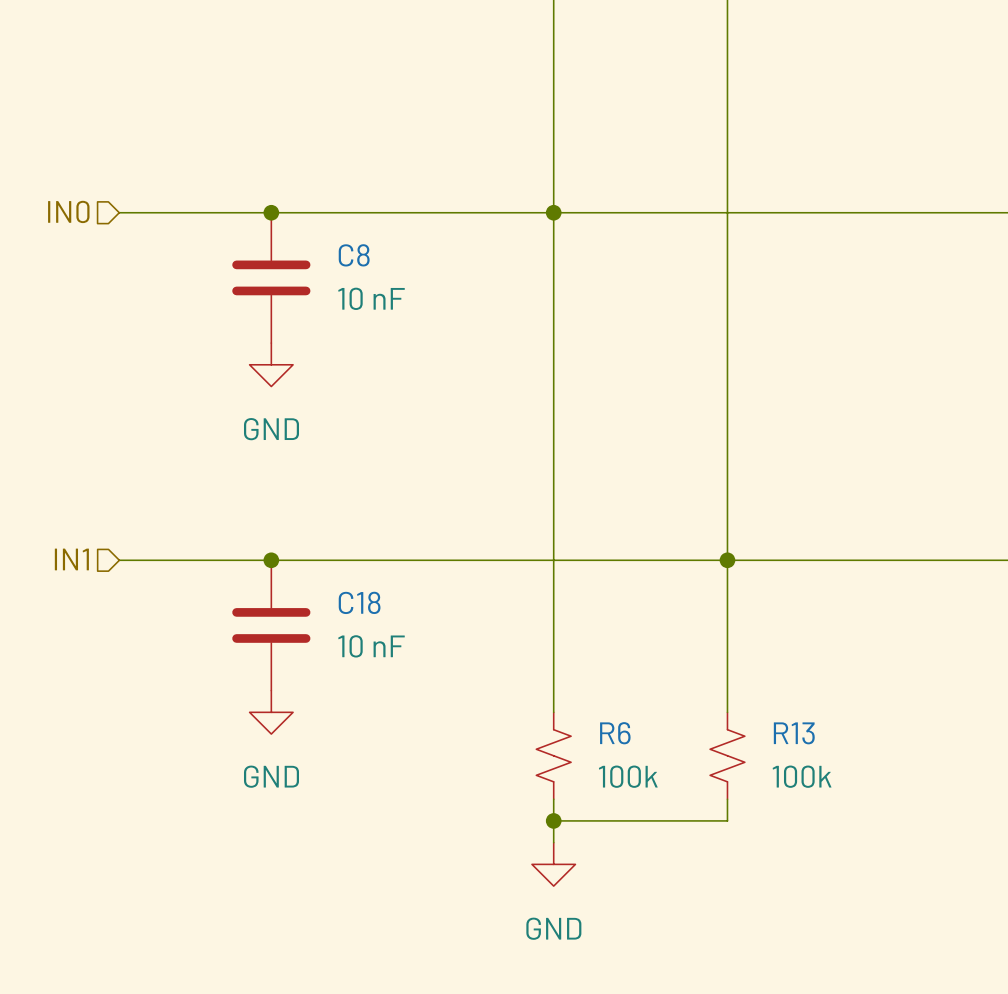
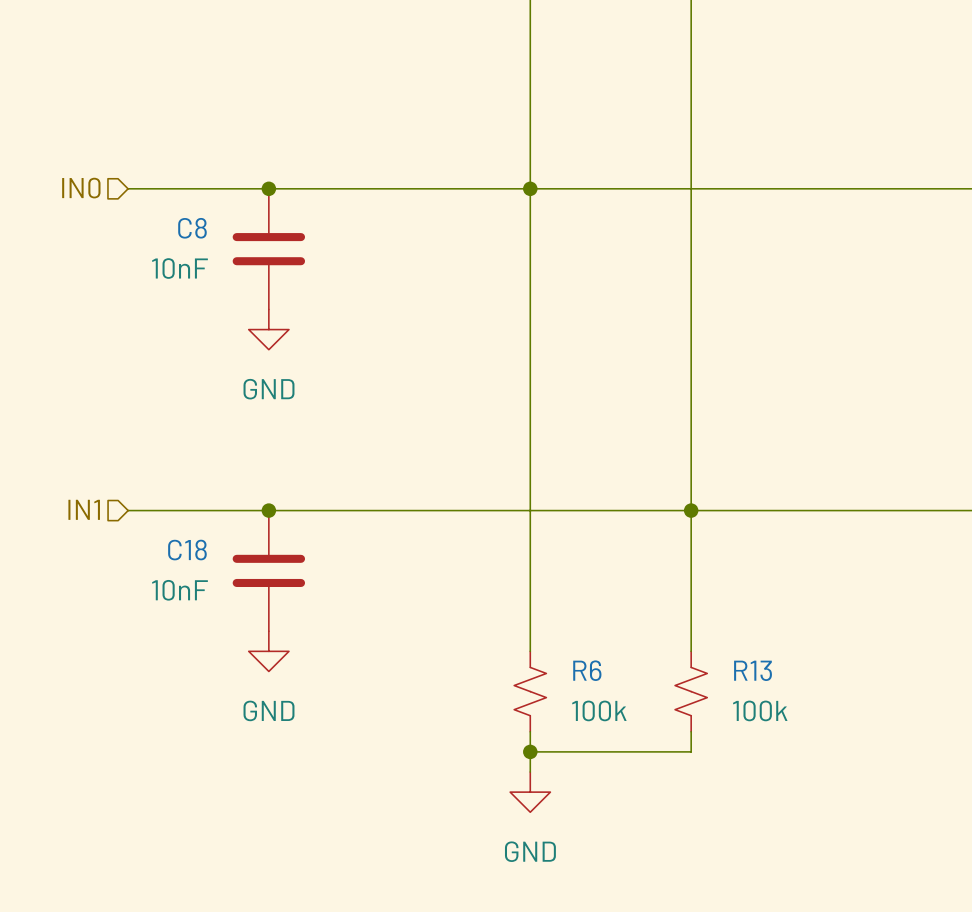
C8 name position: C8 (354, 255) -> C8 (192, 228)
C8 value: 10 nF (371, 298) -> 10nF (179, 268)
C18 name position: C18 (359, 602) -> C18 (187, 550)
C18 value: 10 nF (371, 646) -> 10nF (179, 590)

